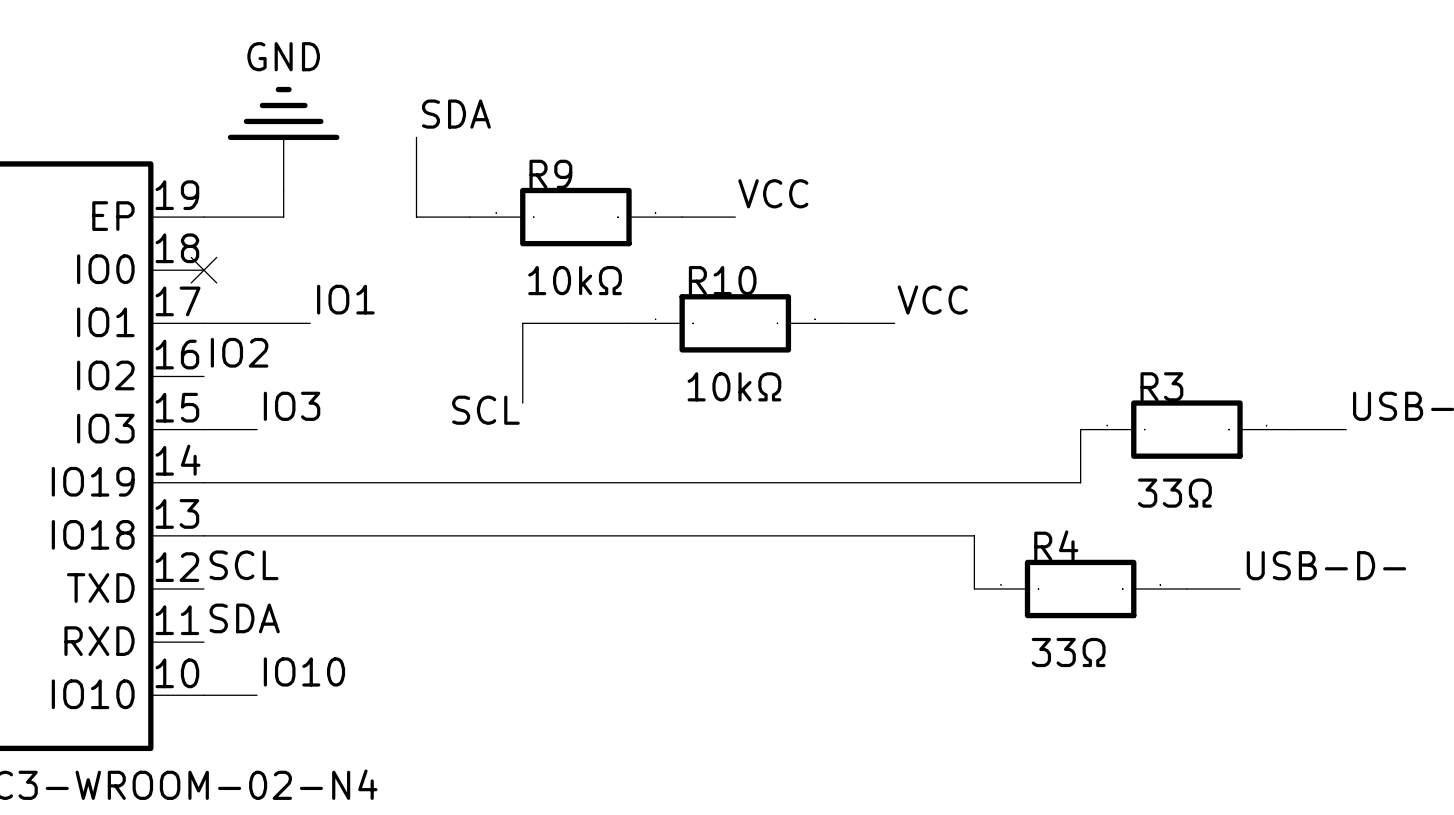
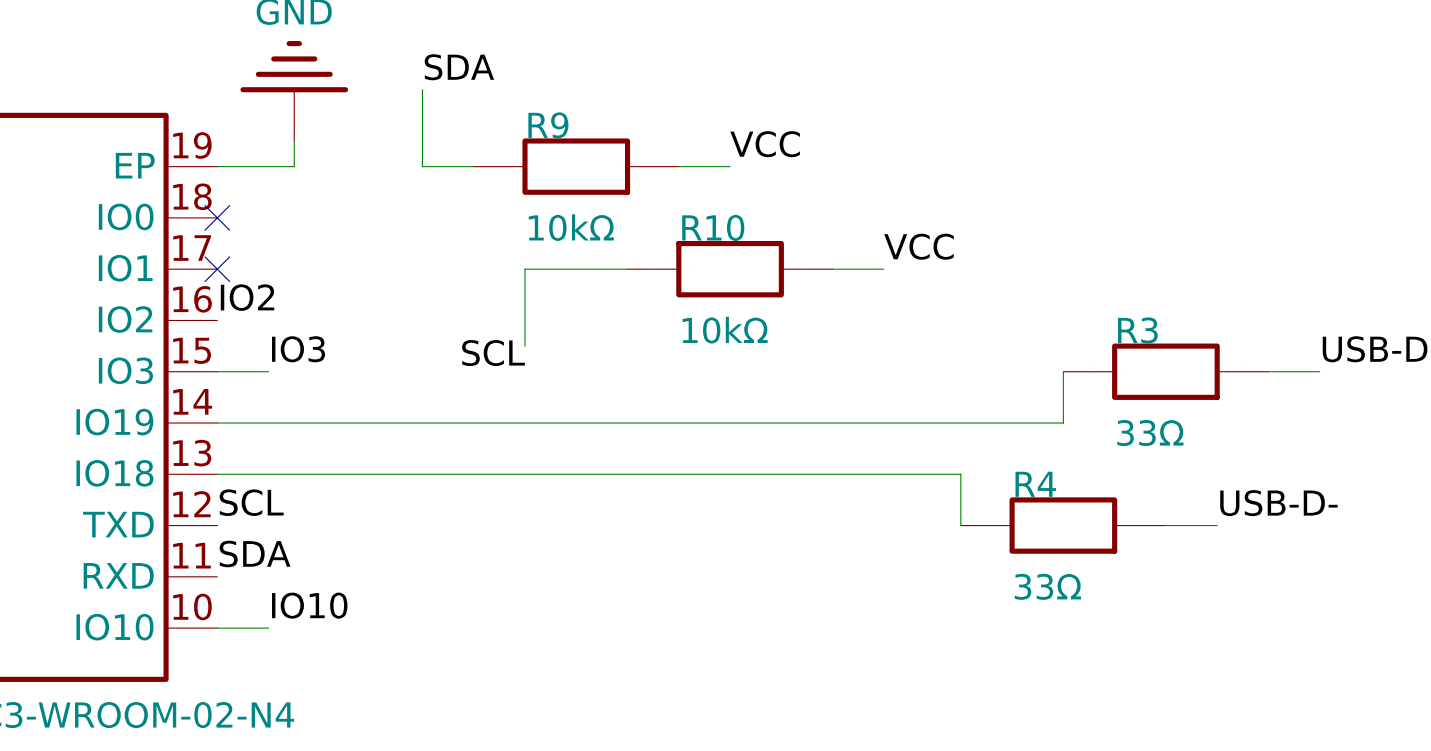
label: IO1 (345, 299) -> none
wire: (203, 323) (310, 323) -> none
no-connect mark: none -> (217, 269)

